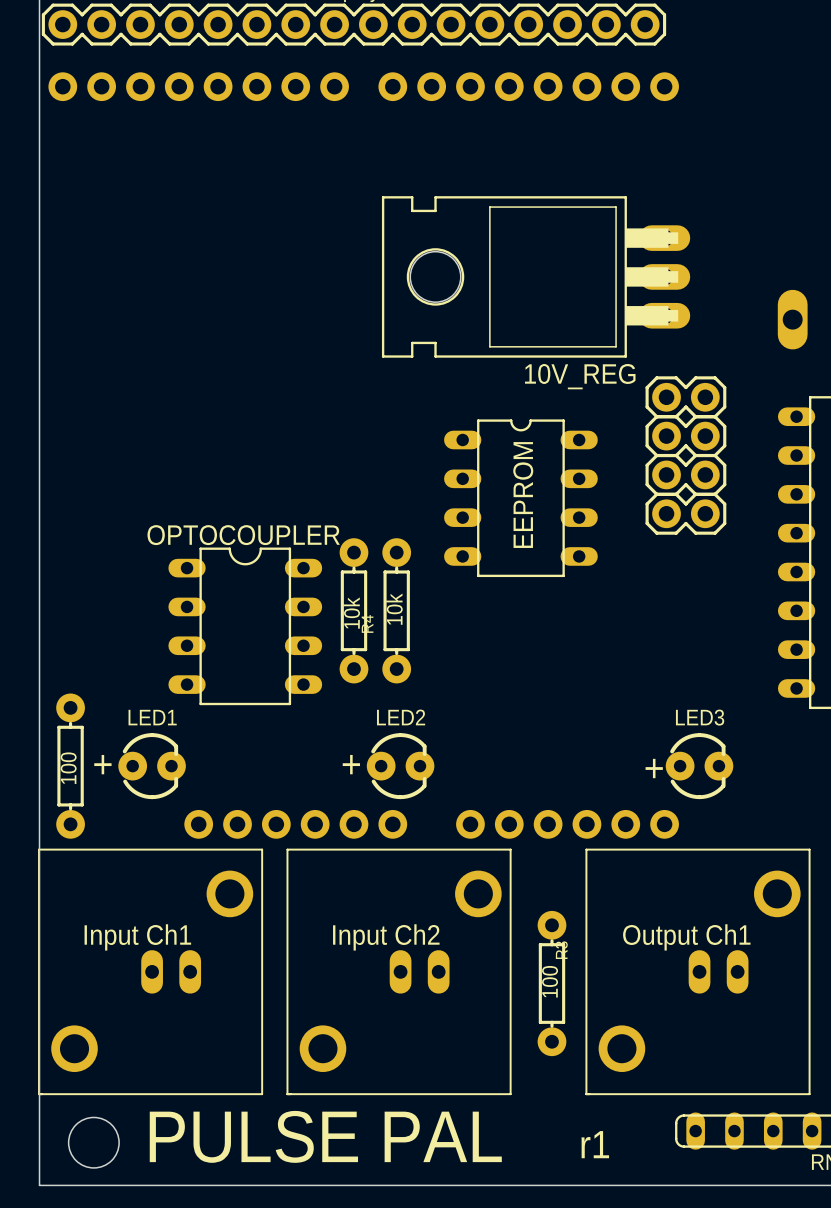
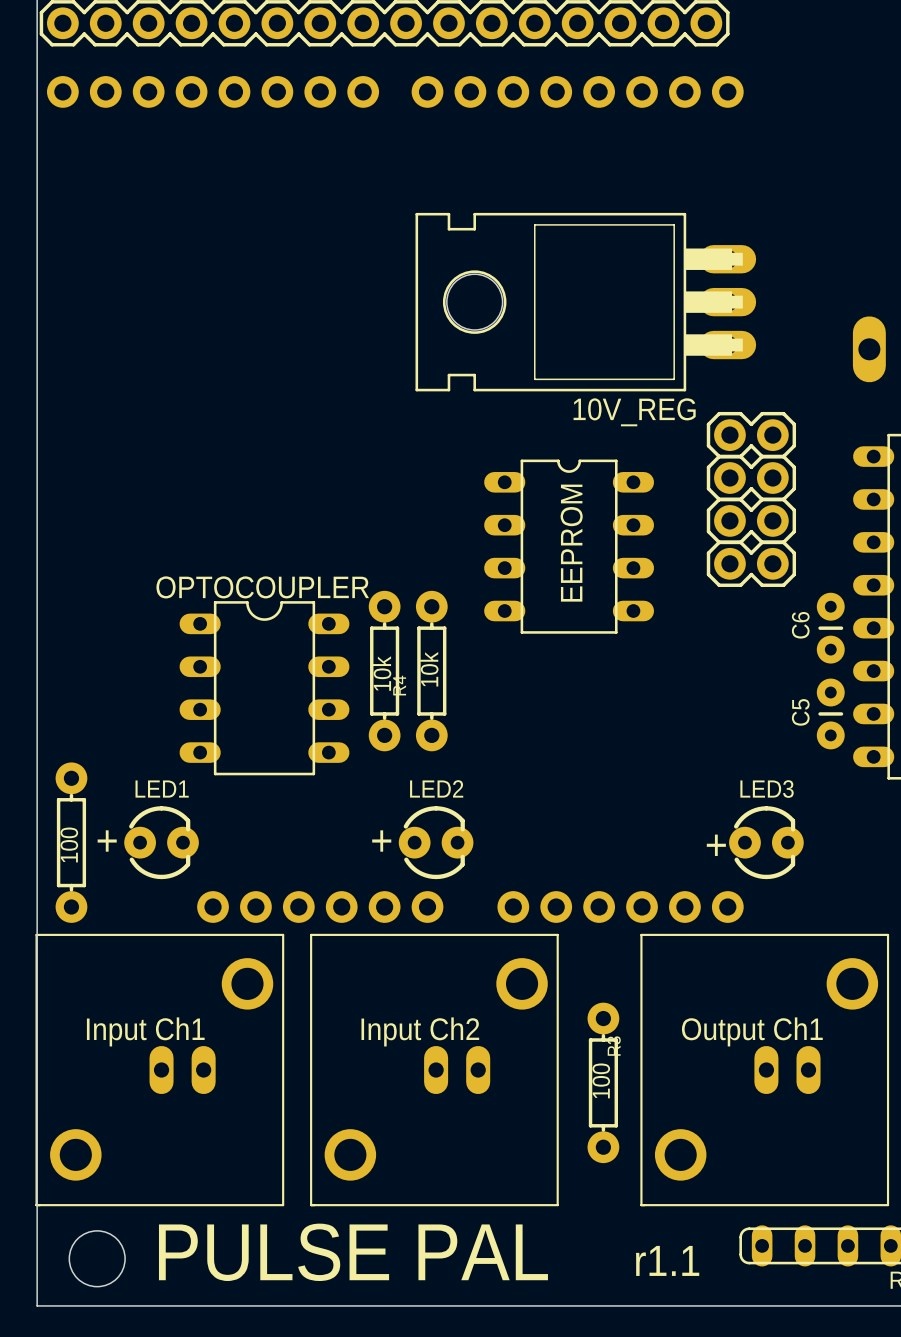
C6: none -> (830, 628)
C5: none -> (830, 713)
text: r1 (595, 1144) -> r1.1 (667, 1260)

